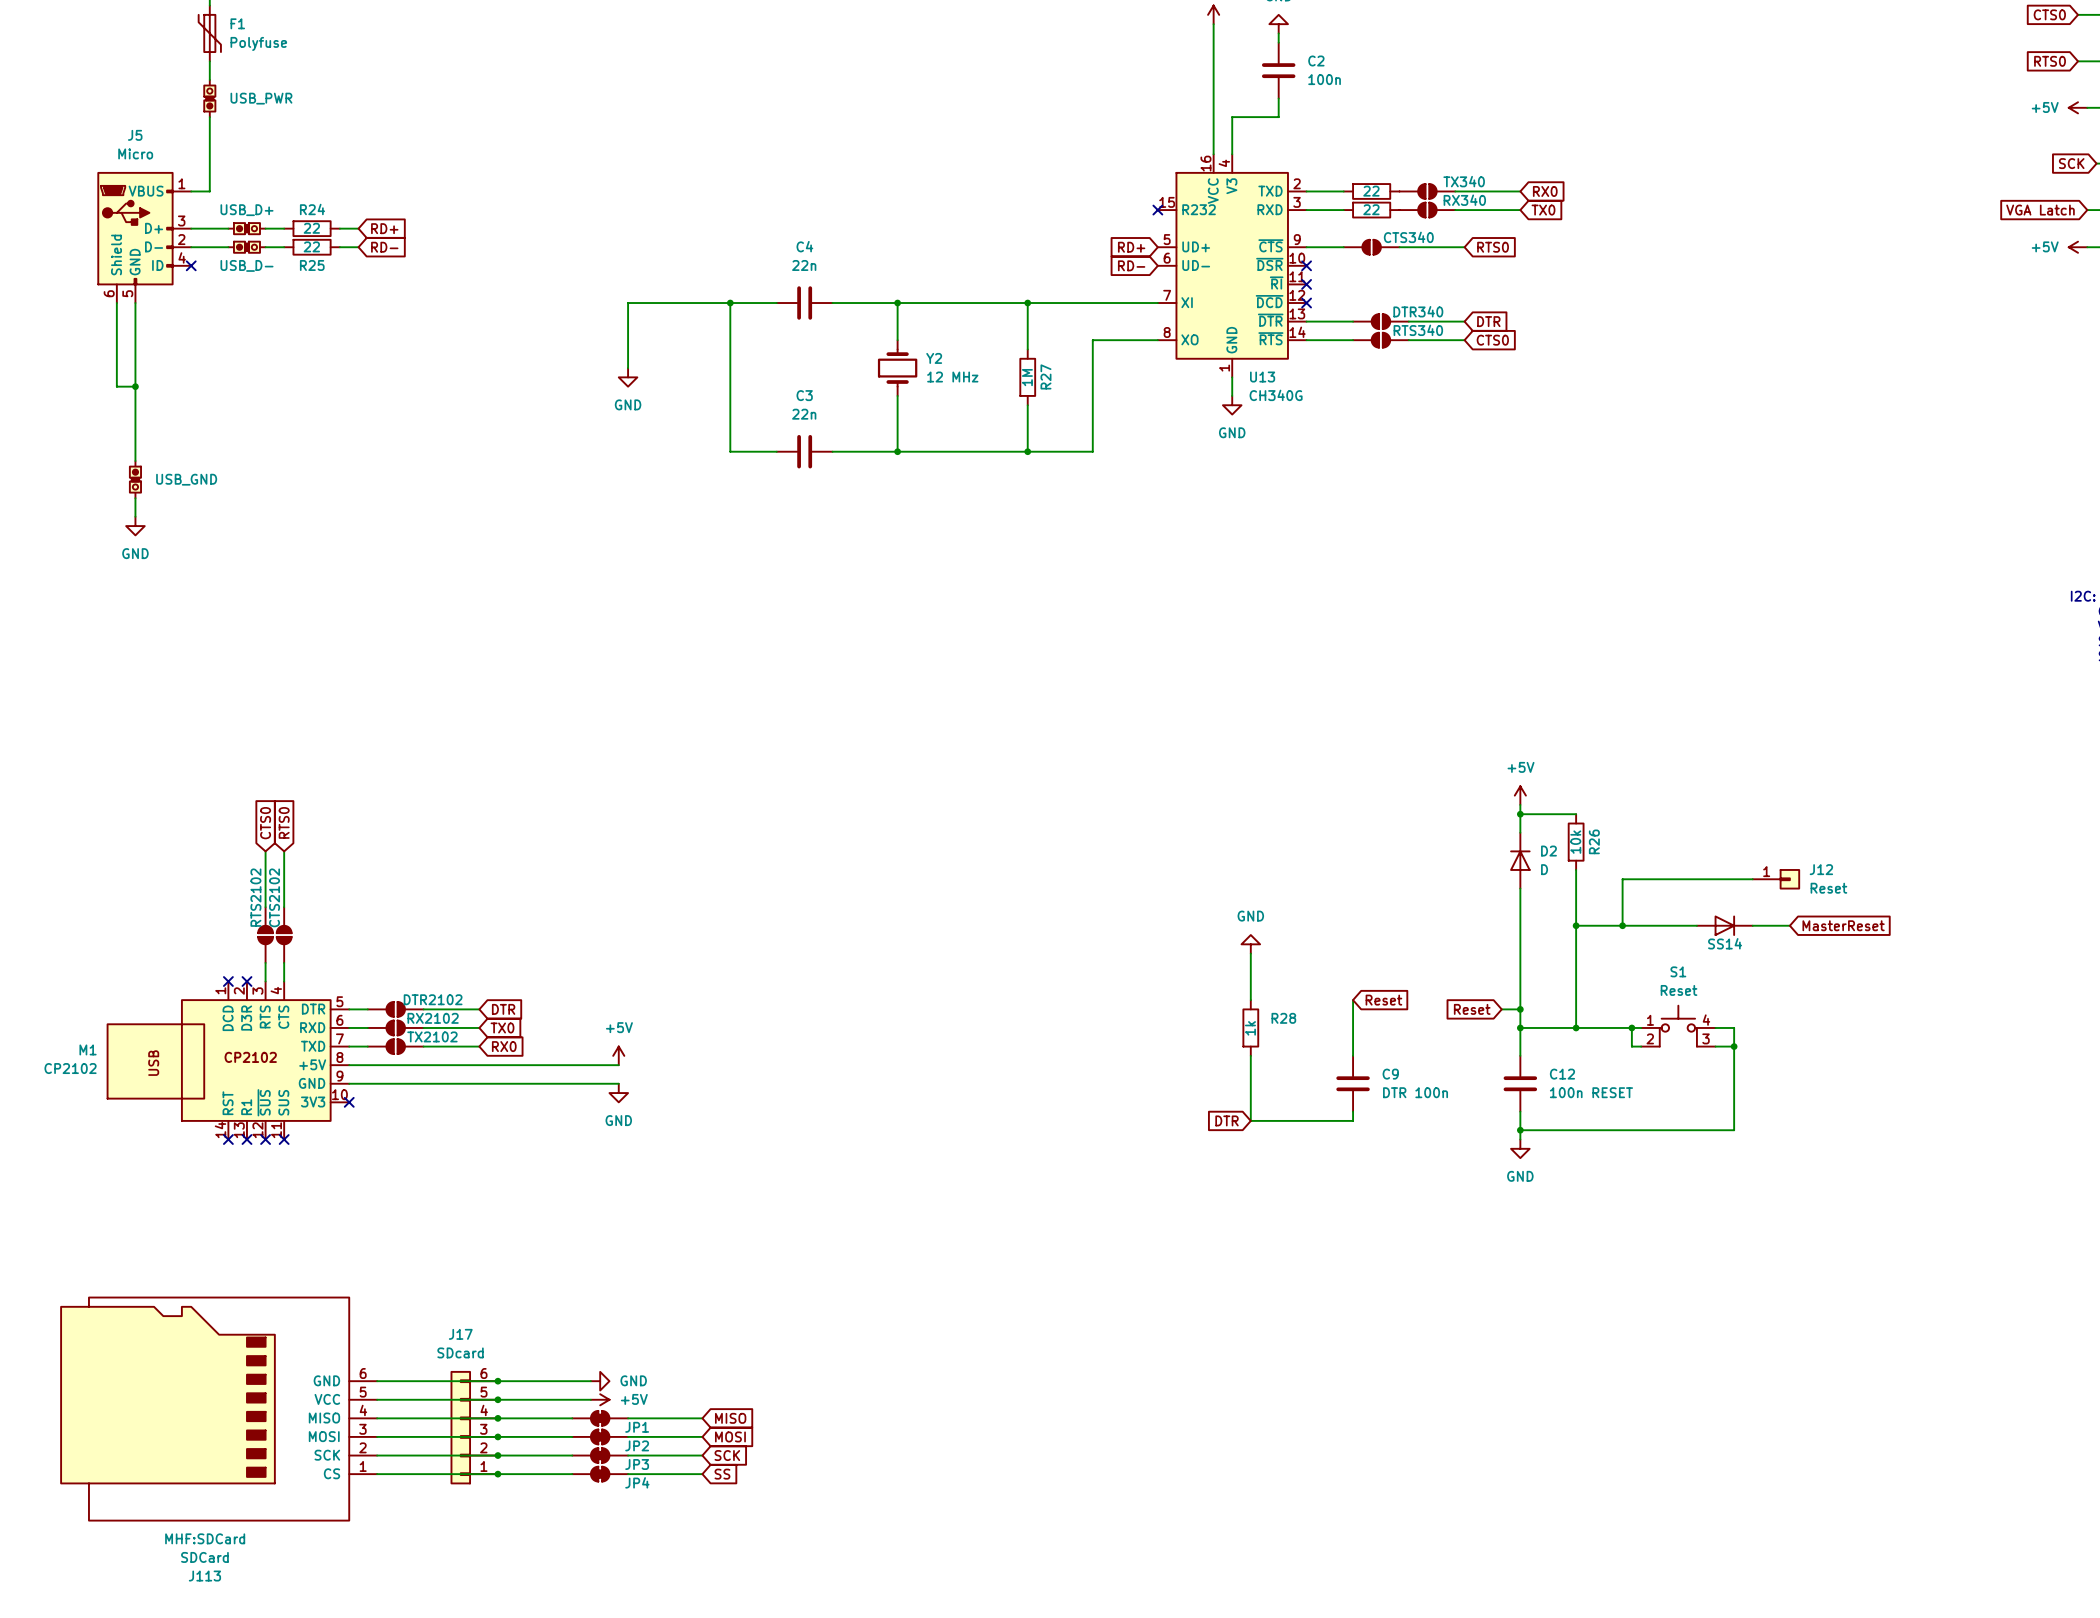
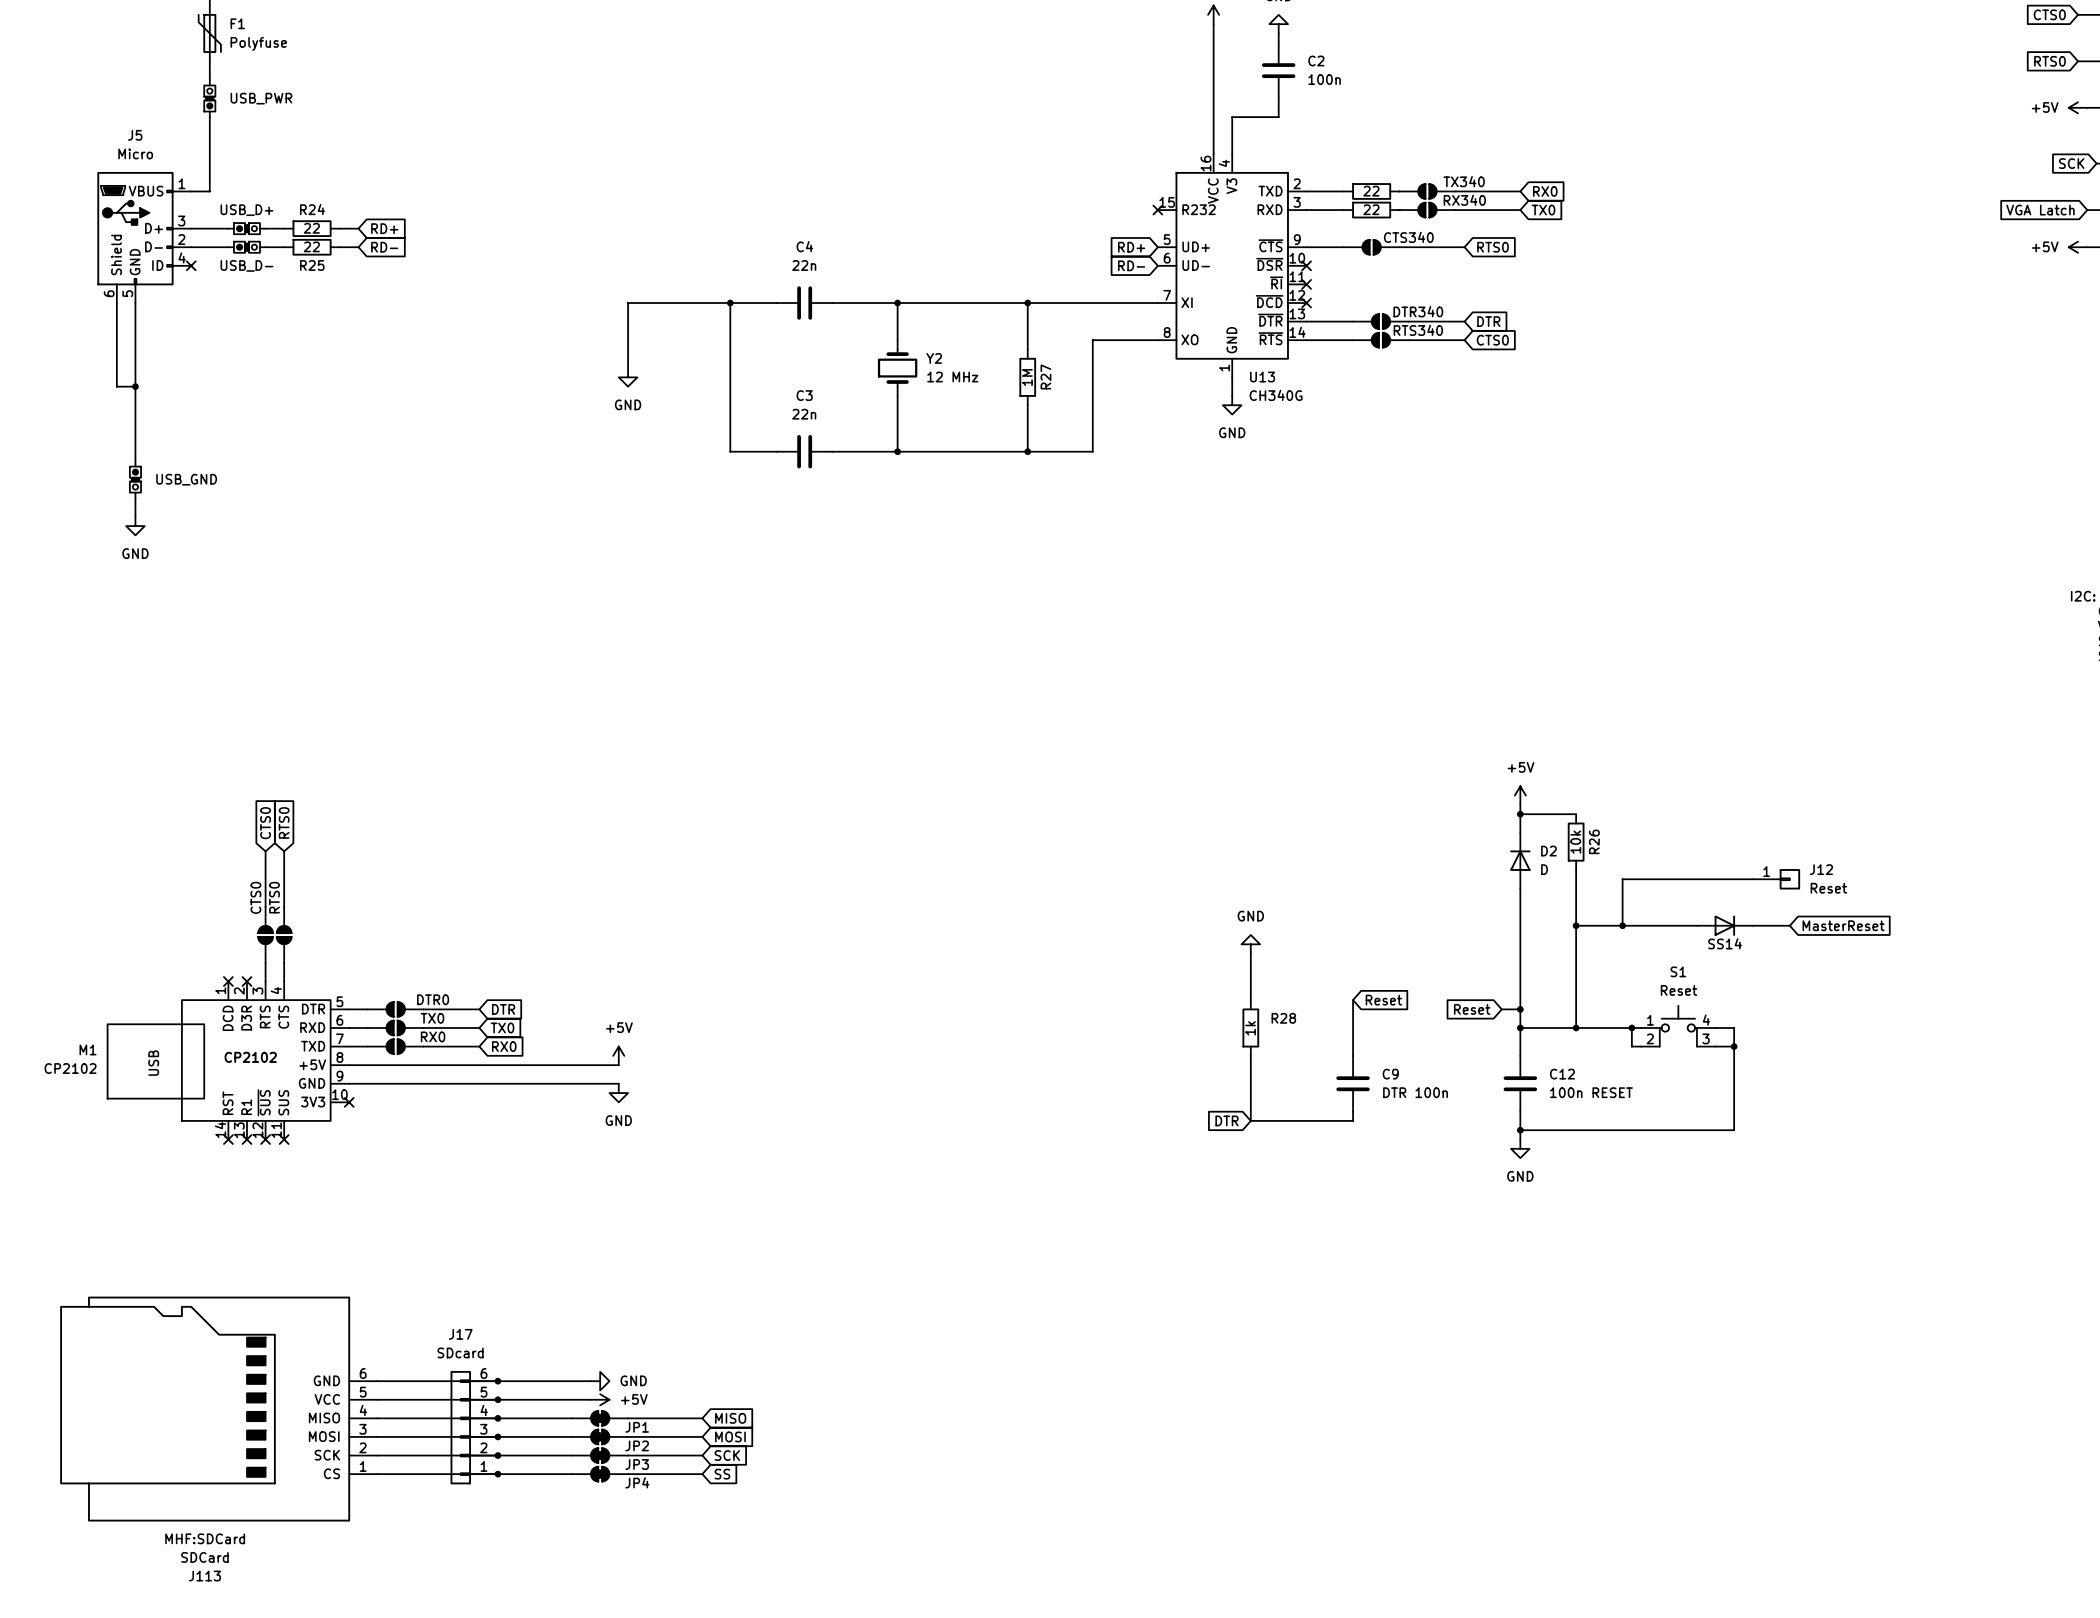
part value: RTS2102 (255, 897) -> CTS0 (255, 897)
part value: CTS2102 (274, 897) -> RTS0 (274, 897)
part value: DTR2102 (433, 999) -> DTR0 (433, 999)
part value: RX2102 (433, 1018) -> TX0 (432, 1018)
part value: TX2102 (432, 1036) -> RX0 (433, 1036)

